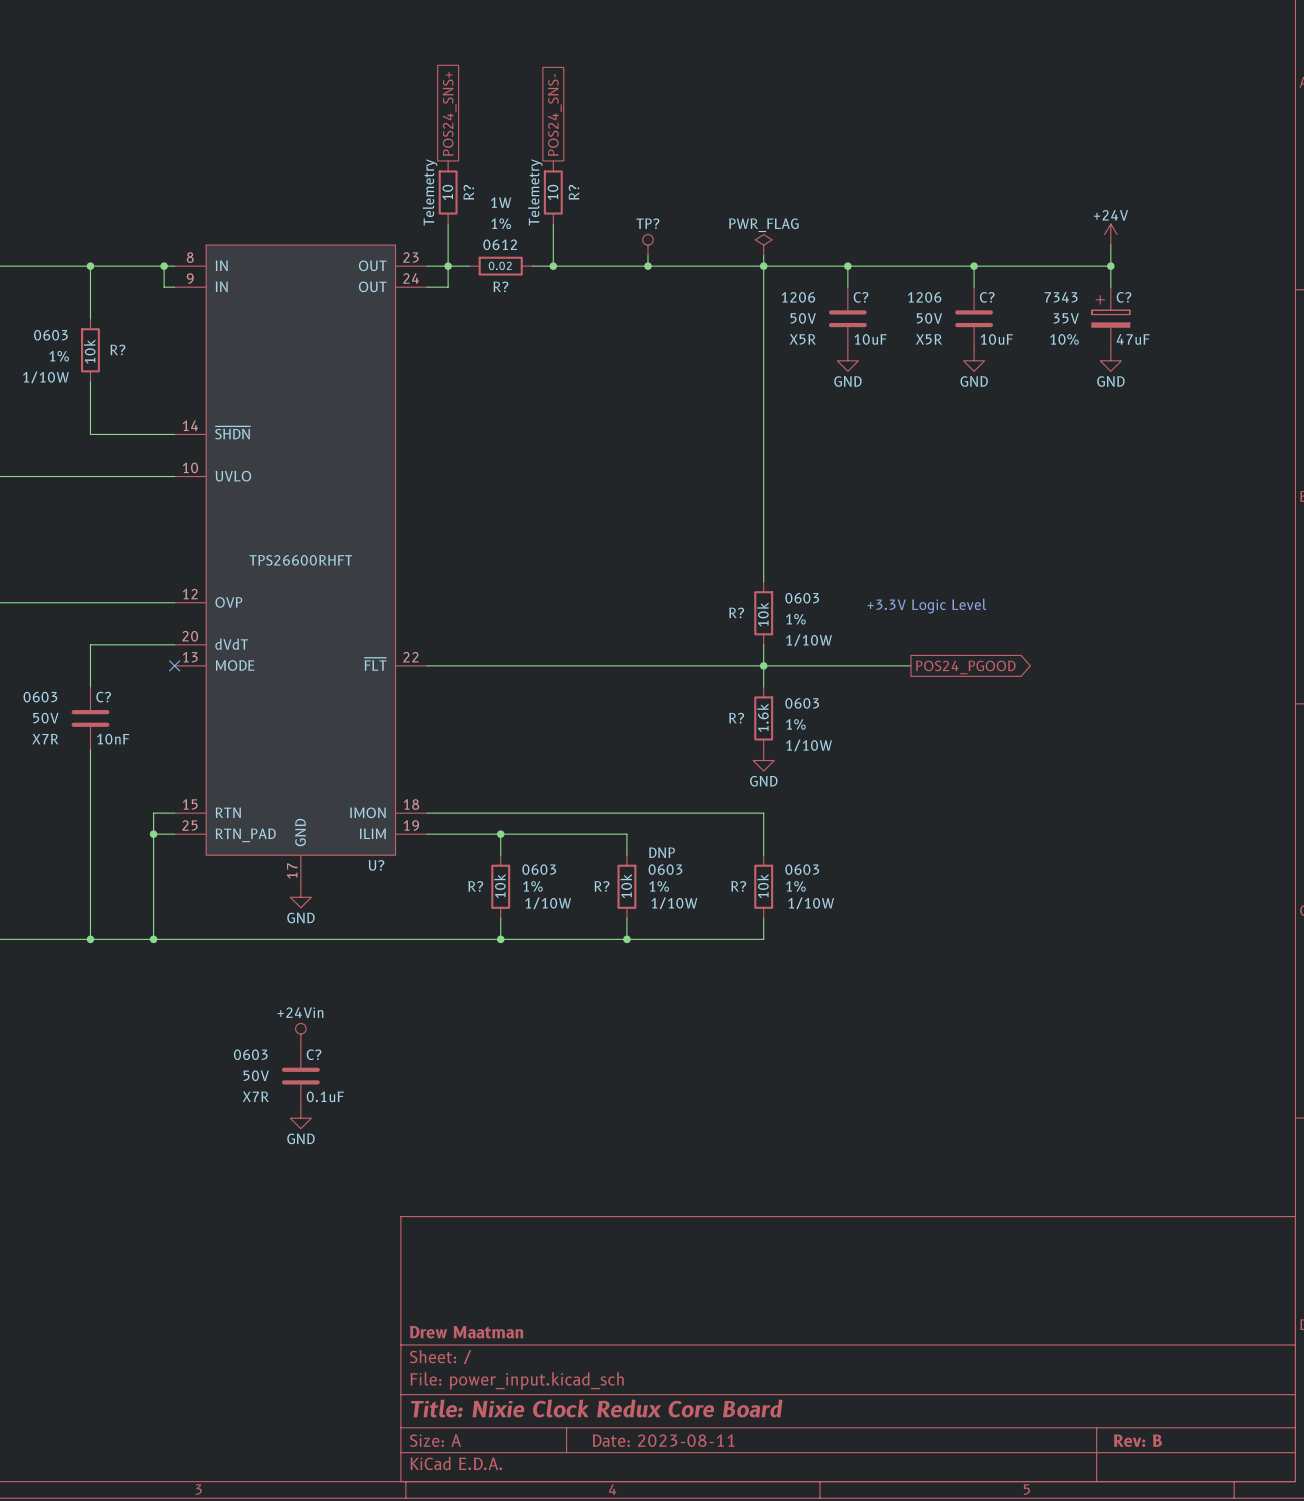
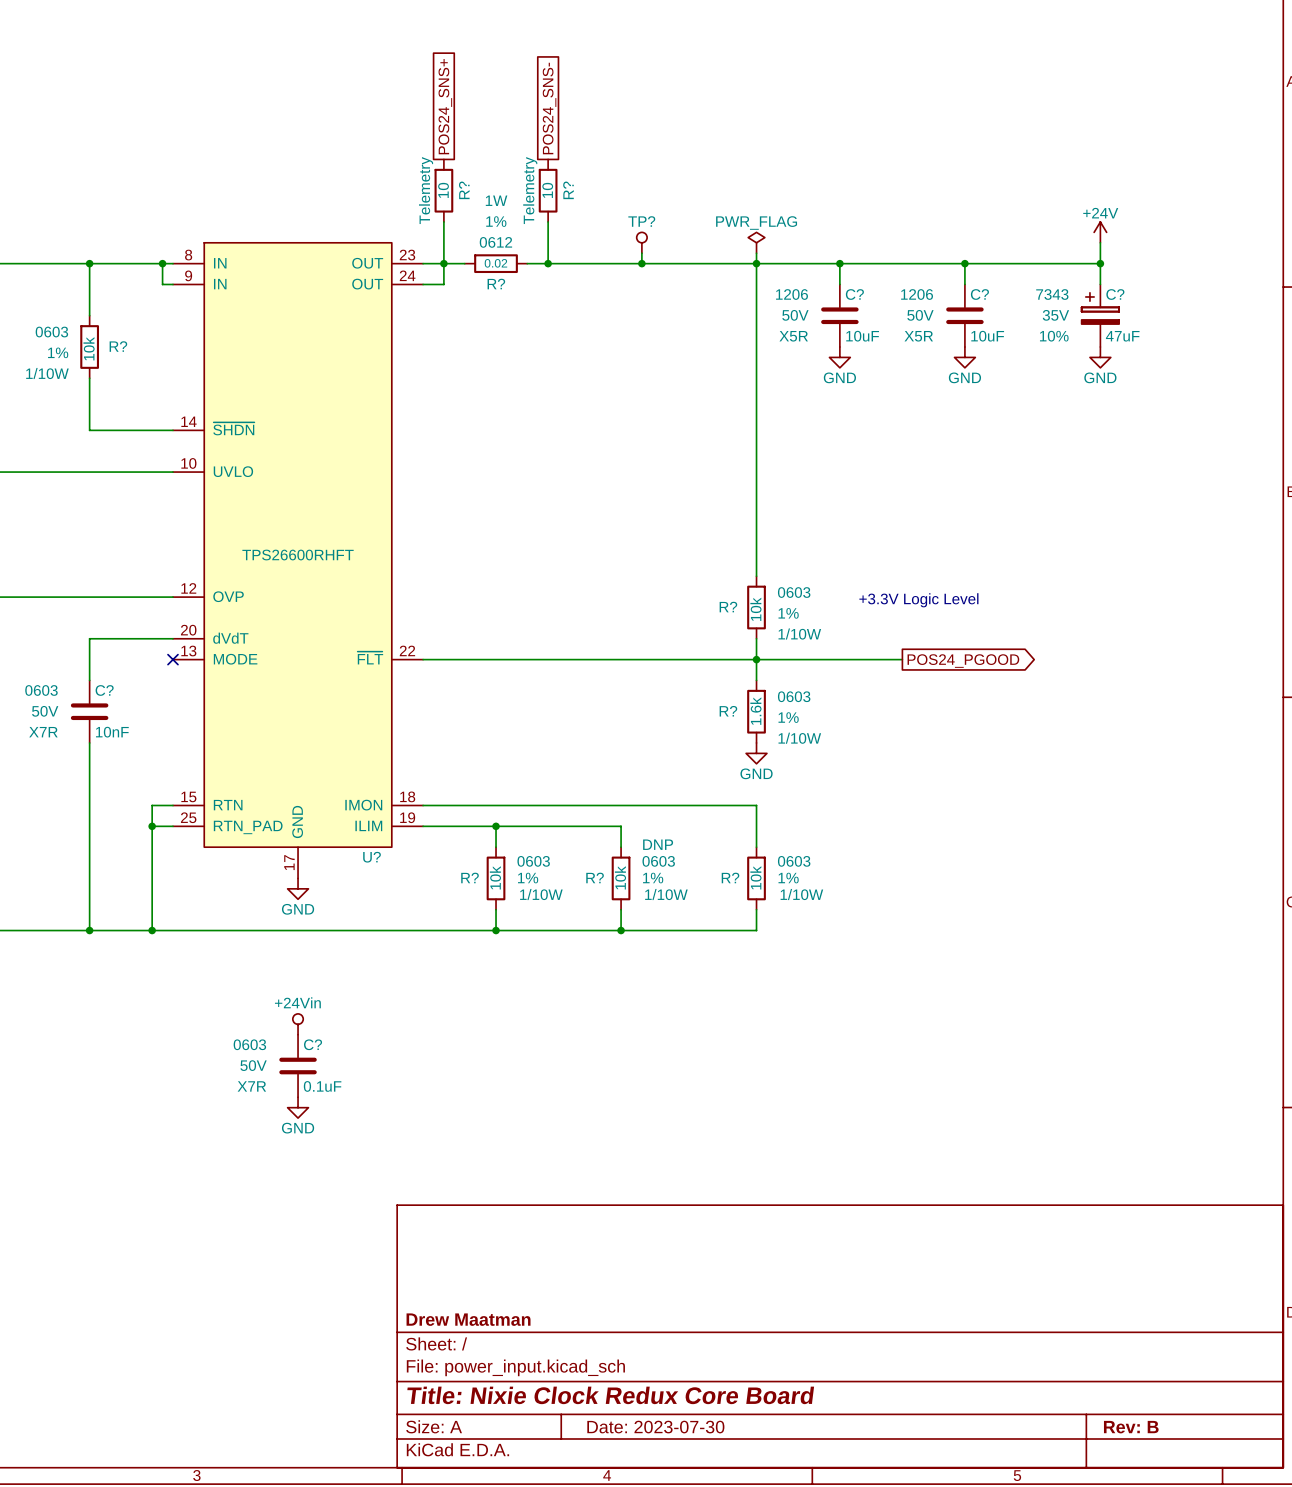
title block: Date: 2023-08-11 (663, 1440) -> Date: 2023-07-30 (655, 1427)

